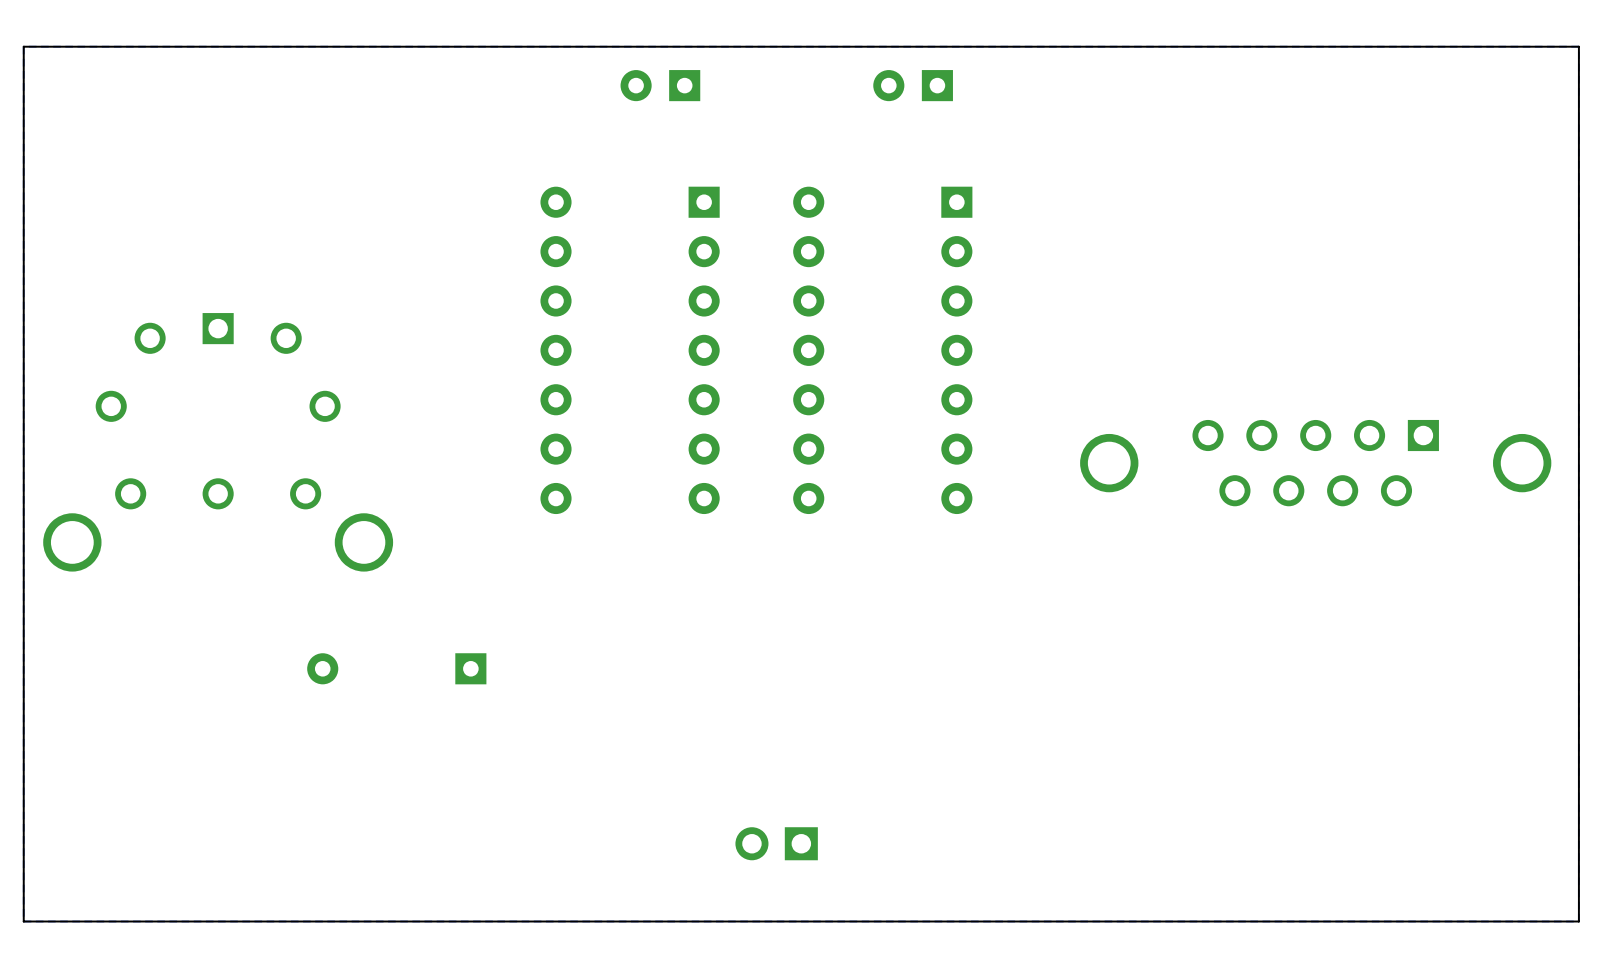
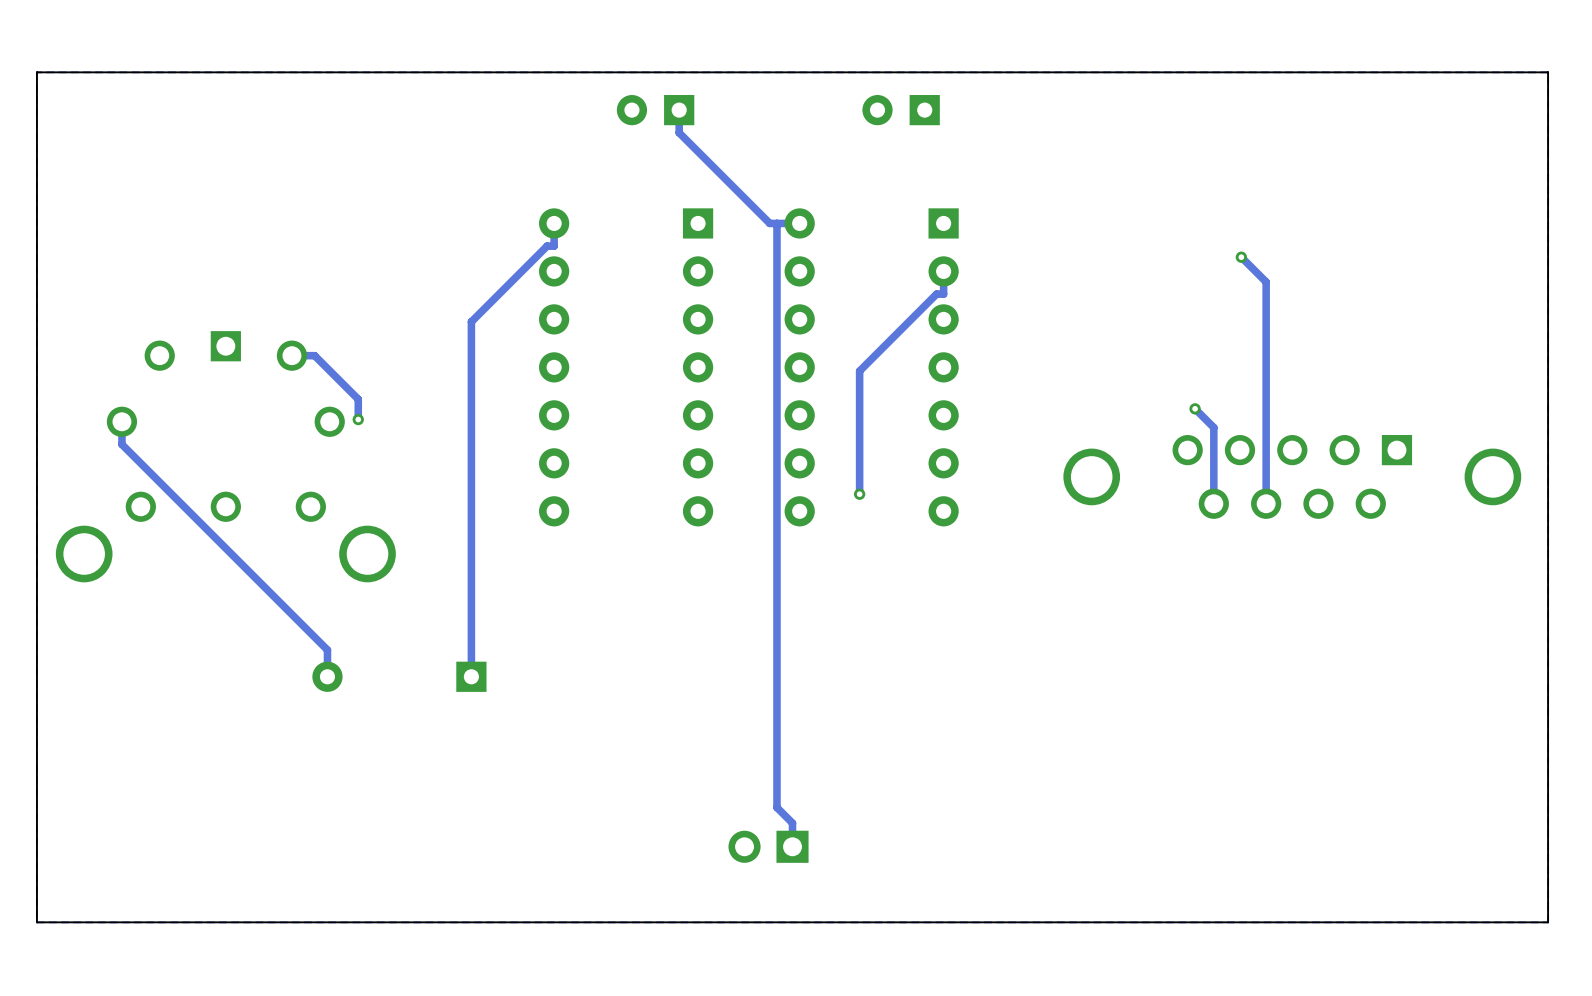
track: none -> (679, 110) (679, 132) (769, 223) (799, 223)
track: none -> (554, 223) (554, 246) (547, 246) (471, 321) (471, 676)
track: none -> (776, 223) (776, 807) (792, 823) (792, 846)
track: none -> (1241, 257) (1266, 281) (1266, 503)
via: none -> (1241, 257)
track: none -> (943, 271) (943, 294) (936, 294) (859, 371) (859, 494)
track: none -> (291, 355) (314, 355) (358, 399) (358, 419)
track: none -> (1195, 408) (1213, 427) (1213, 503)
via: none -> (1195, 408)
via: none -> (358, 419)
track: none -> (121, 421) (121, 444) (327, 649) (327, 676)
via: none -> (859, 494)

